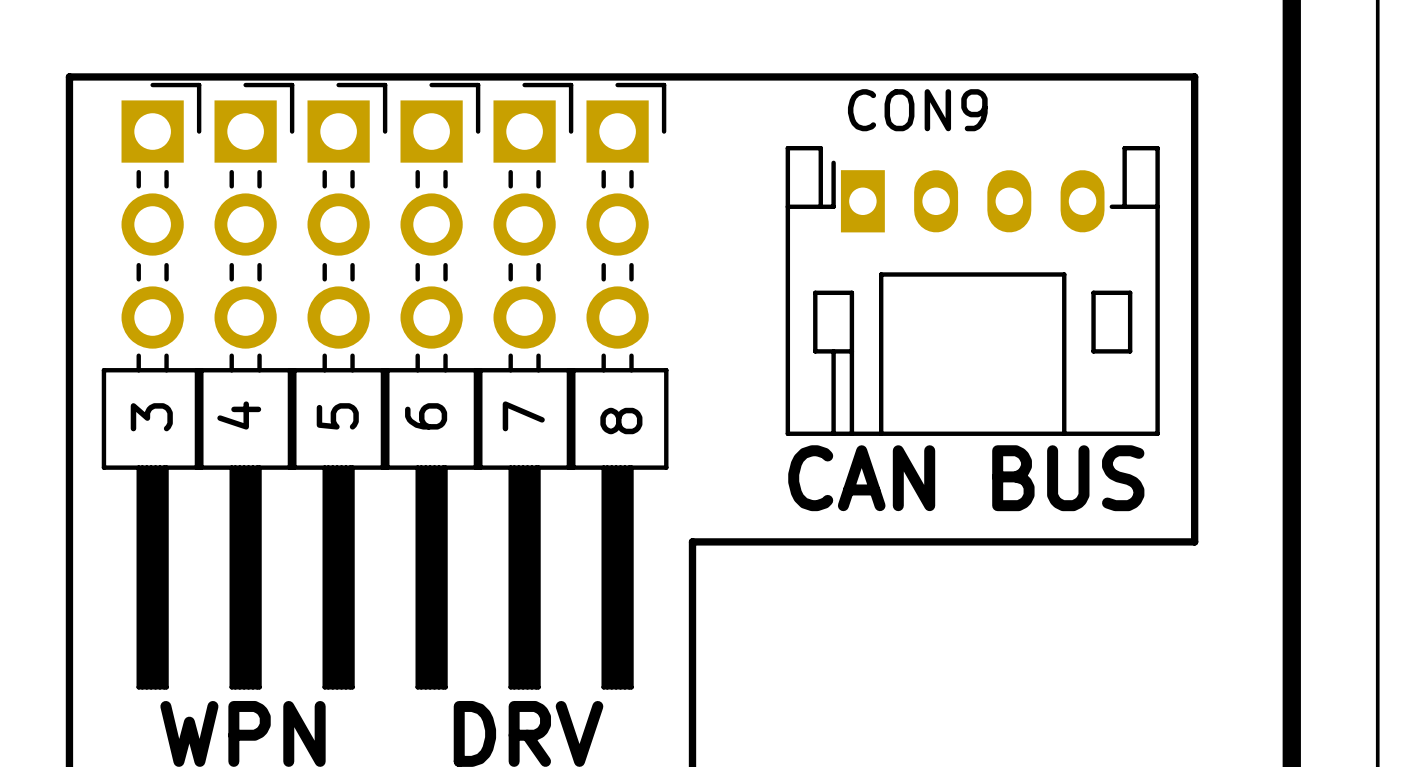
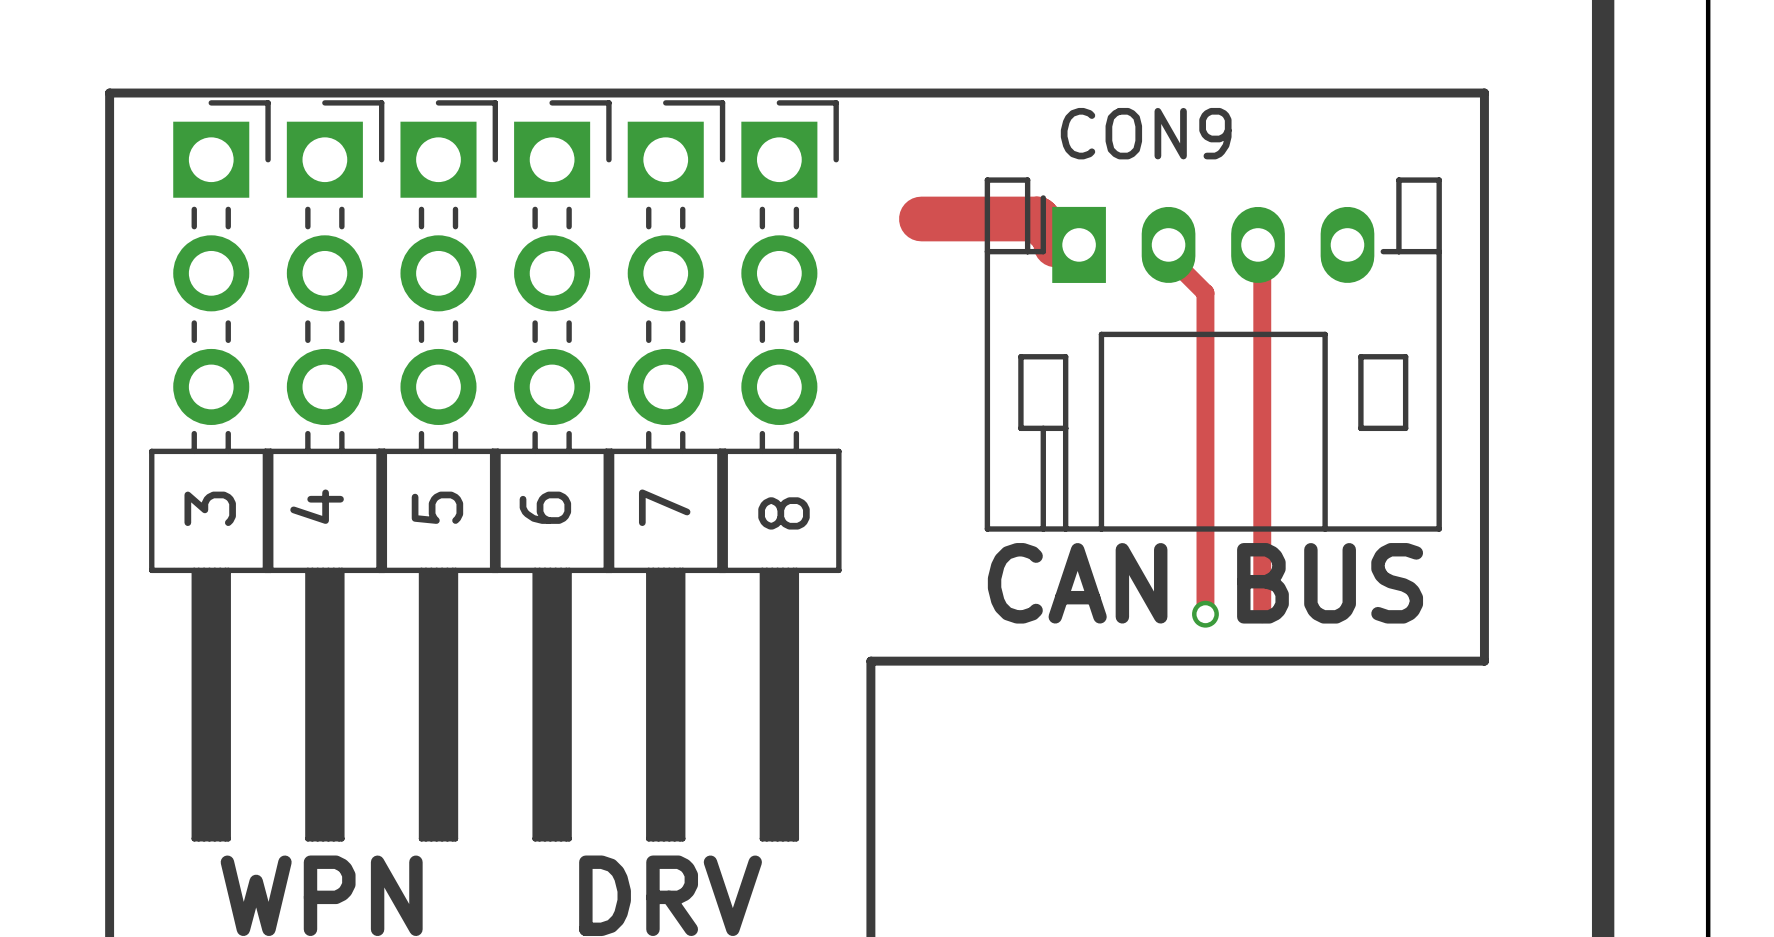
track: none -> (921, 218) (1037, 218) (1055, 237) (1055, 244)
track: none -> (1168, 256) (1205, 293) (1205, 614)
track: none -> (1262, 260) (1262, 614)
via: none -> (1205, 614)

